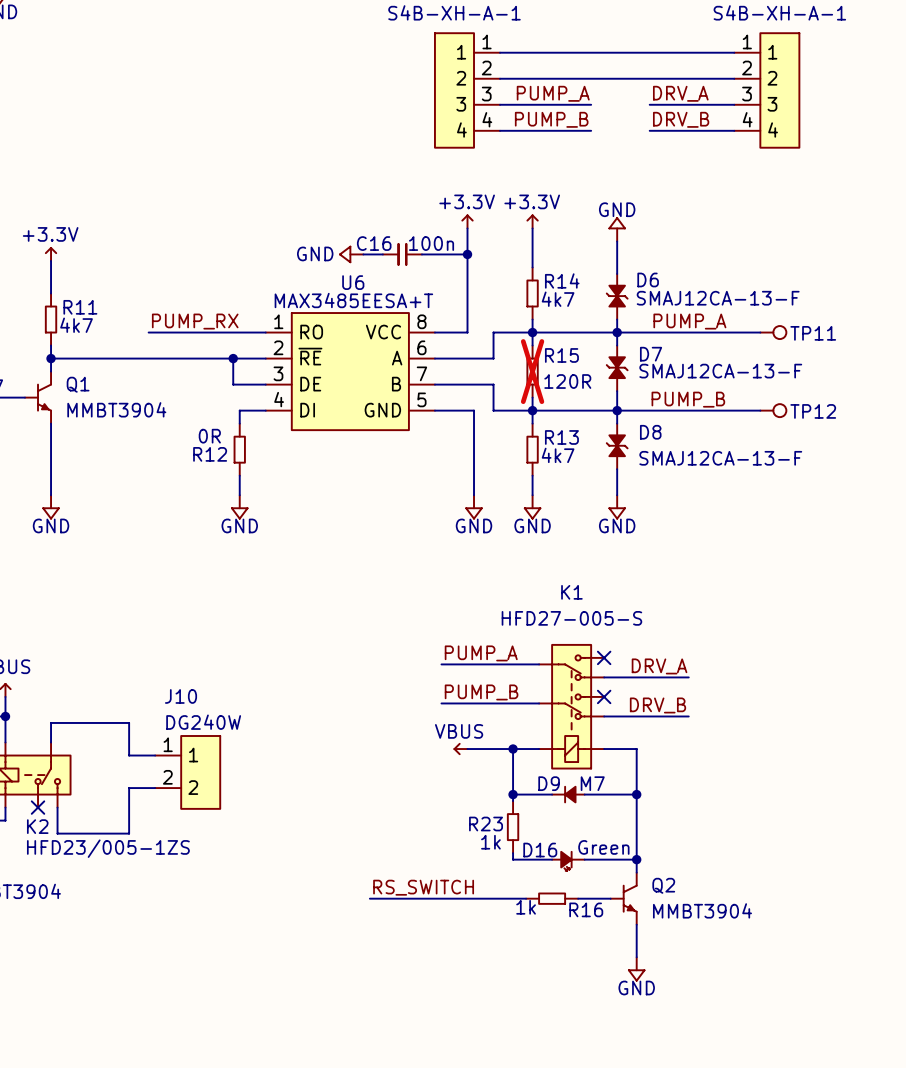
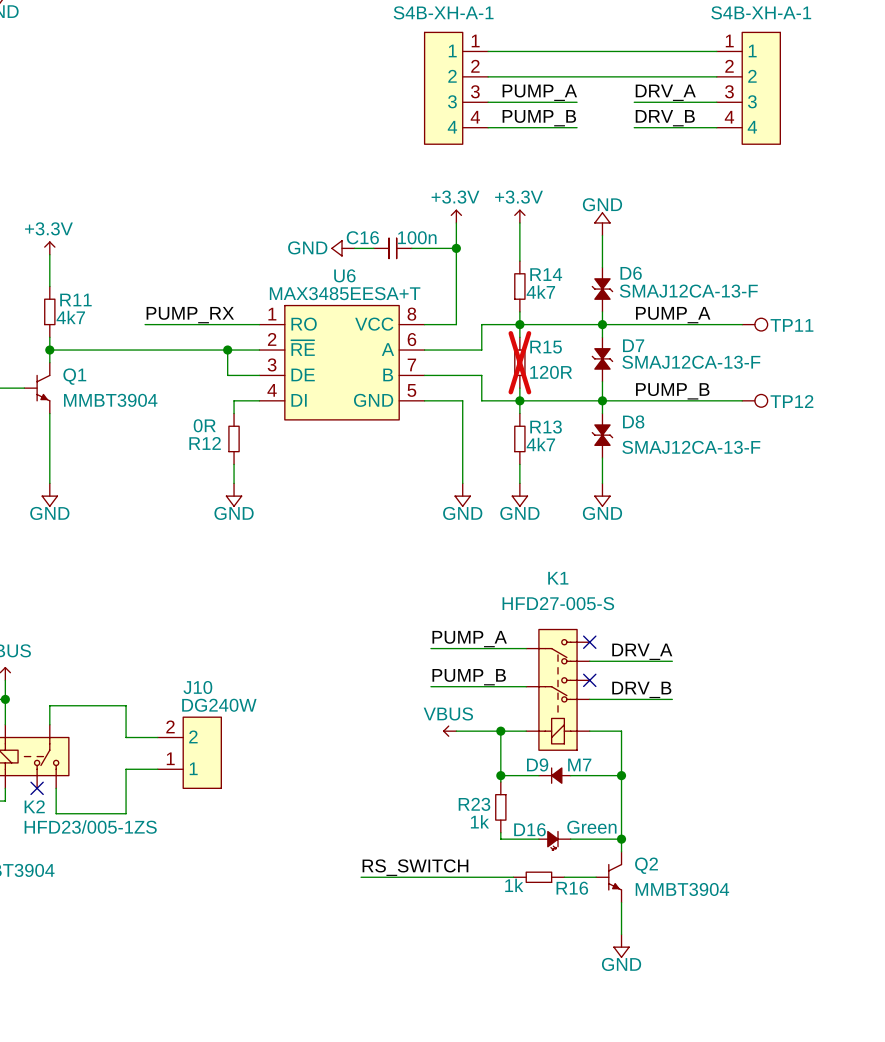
J10 flip: as is (200, 772) -> up-down (202, 752)

